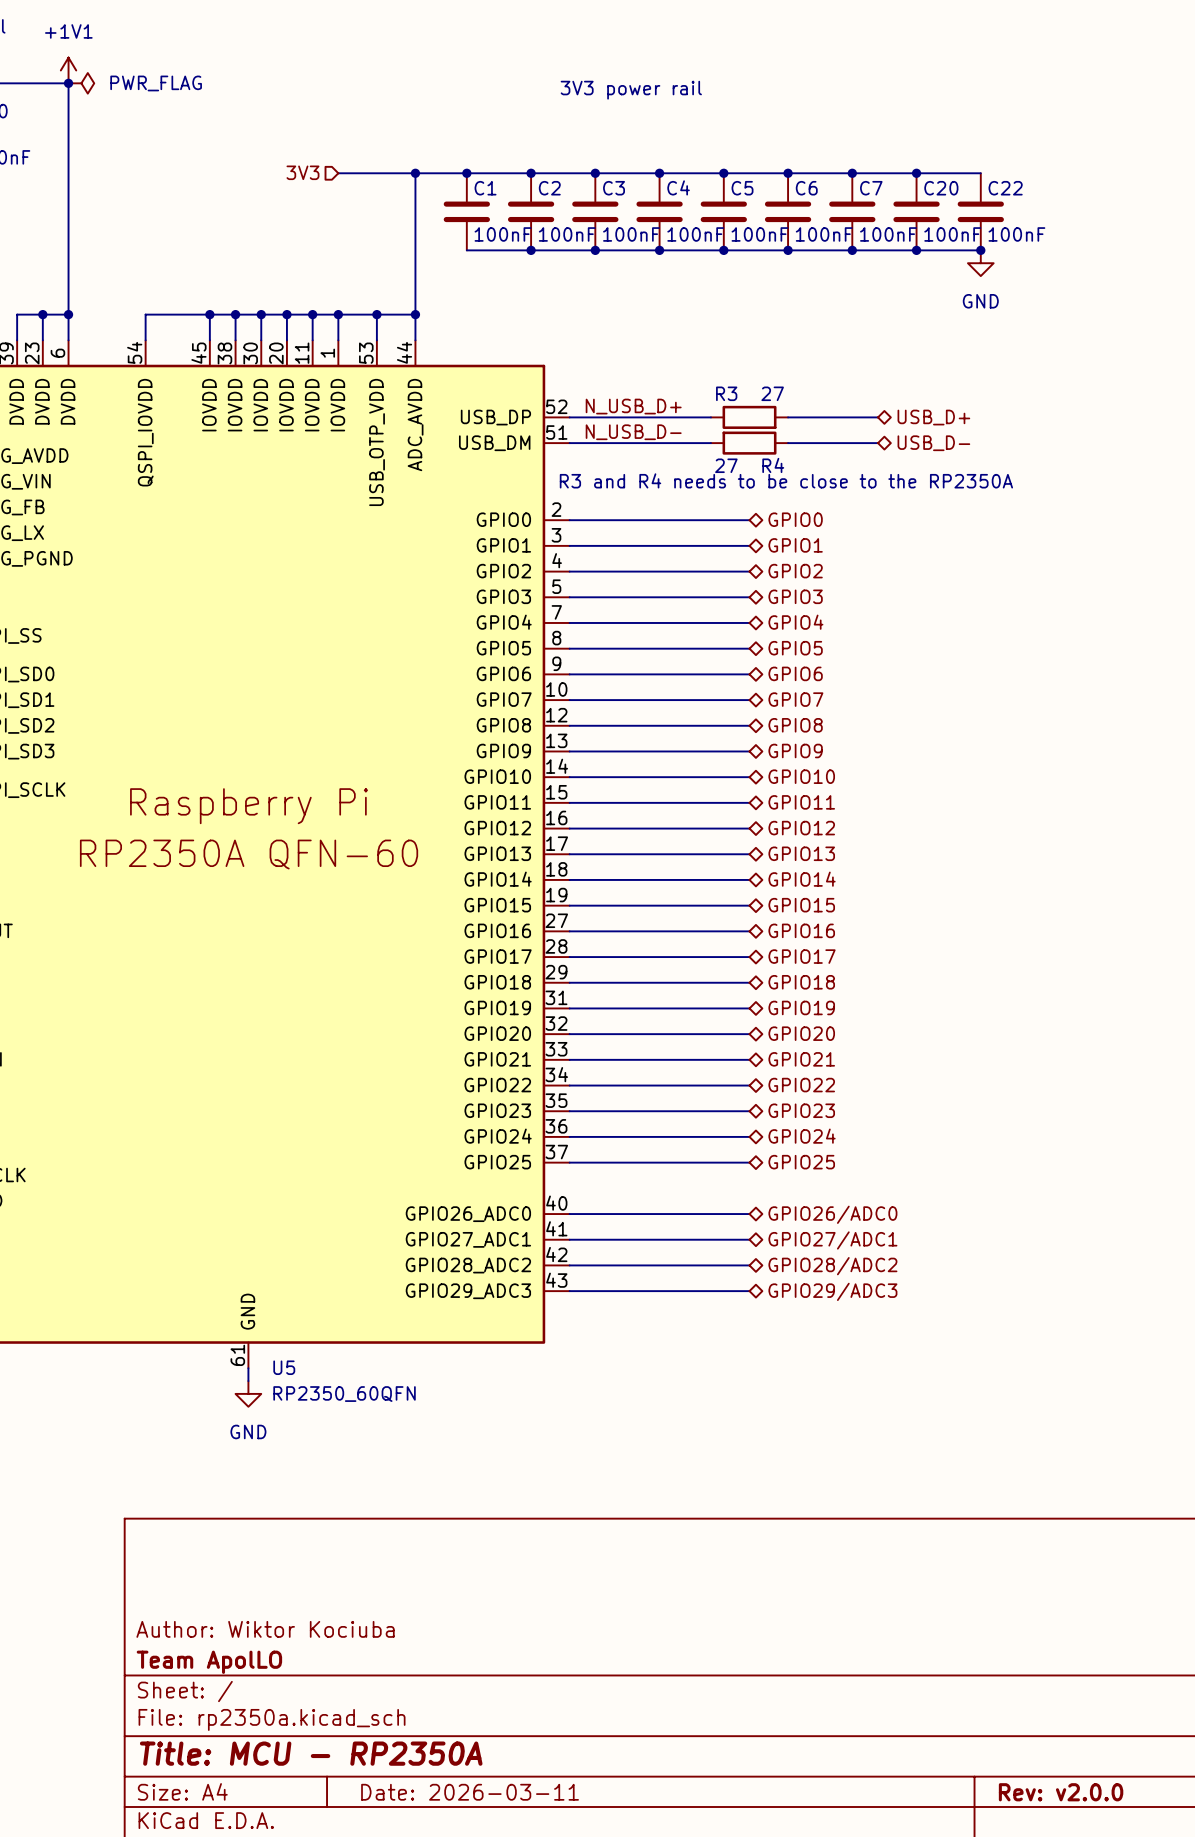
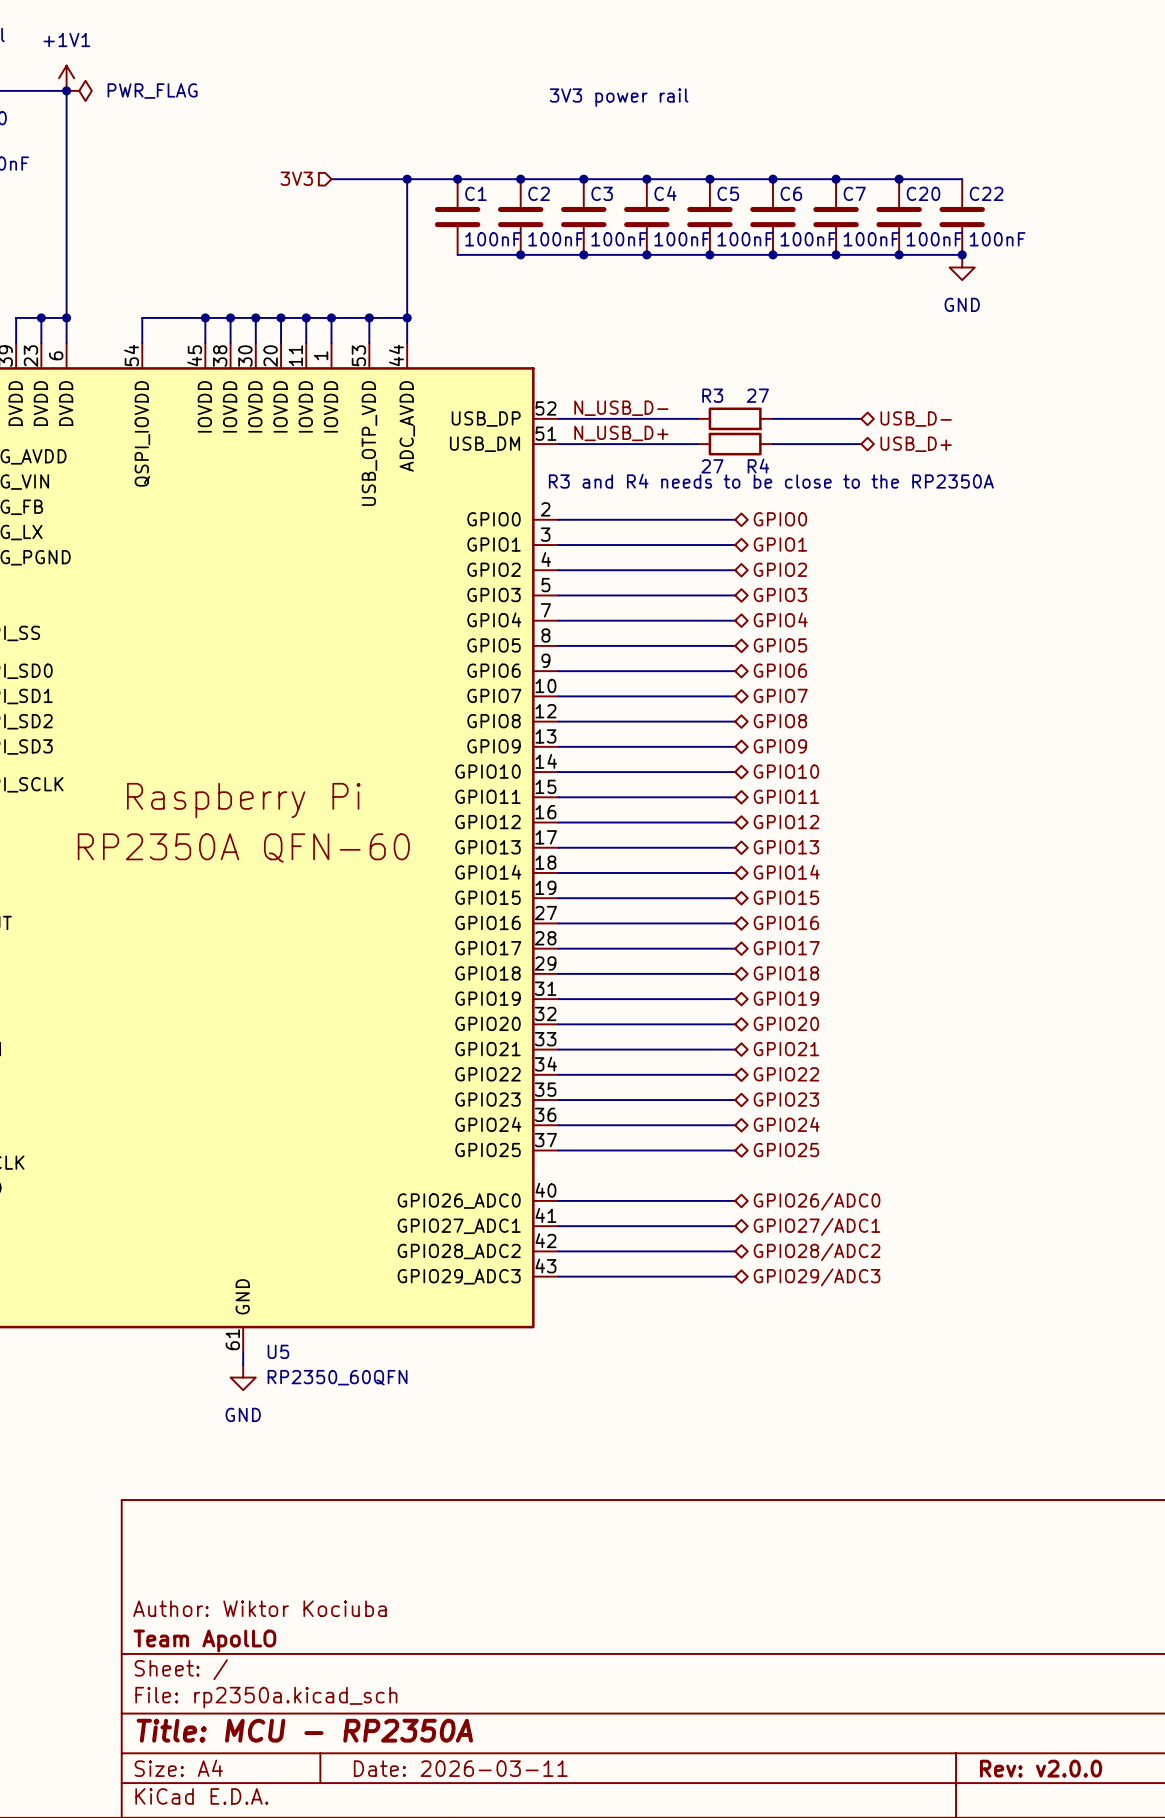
label: N_USB_D+ (633, 406) -> N_USB_D- (621, 408)
hierarchical label: USB_D+ (933, 417) -> USB_D- (916, 419)
label: N_USB_D- (633, 432) -> N_USB_D+ (621, 433)
hierarchical label: USB_D- (933, 443) -> USB_D+ (916, 444)

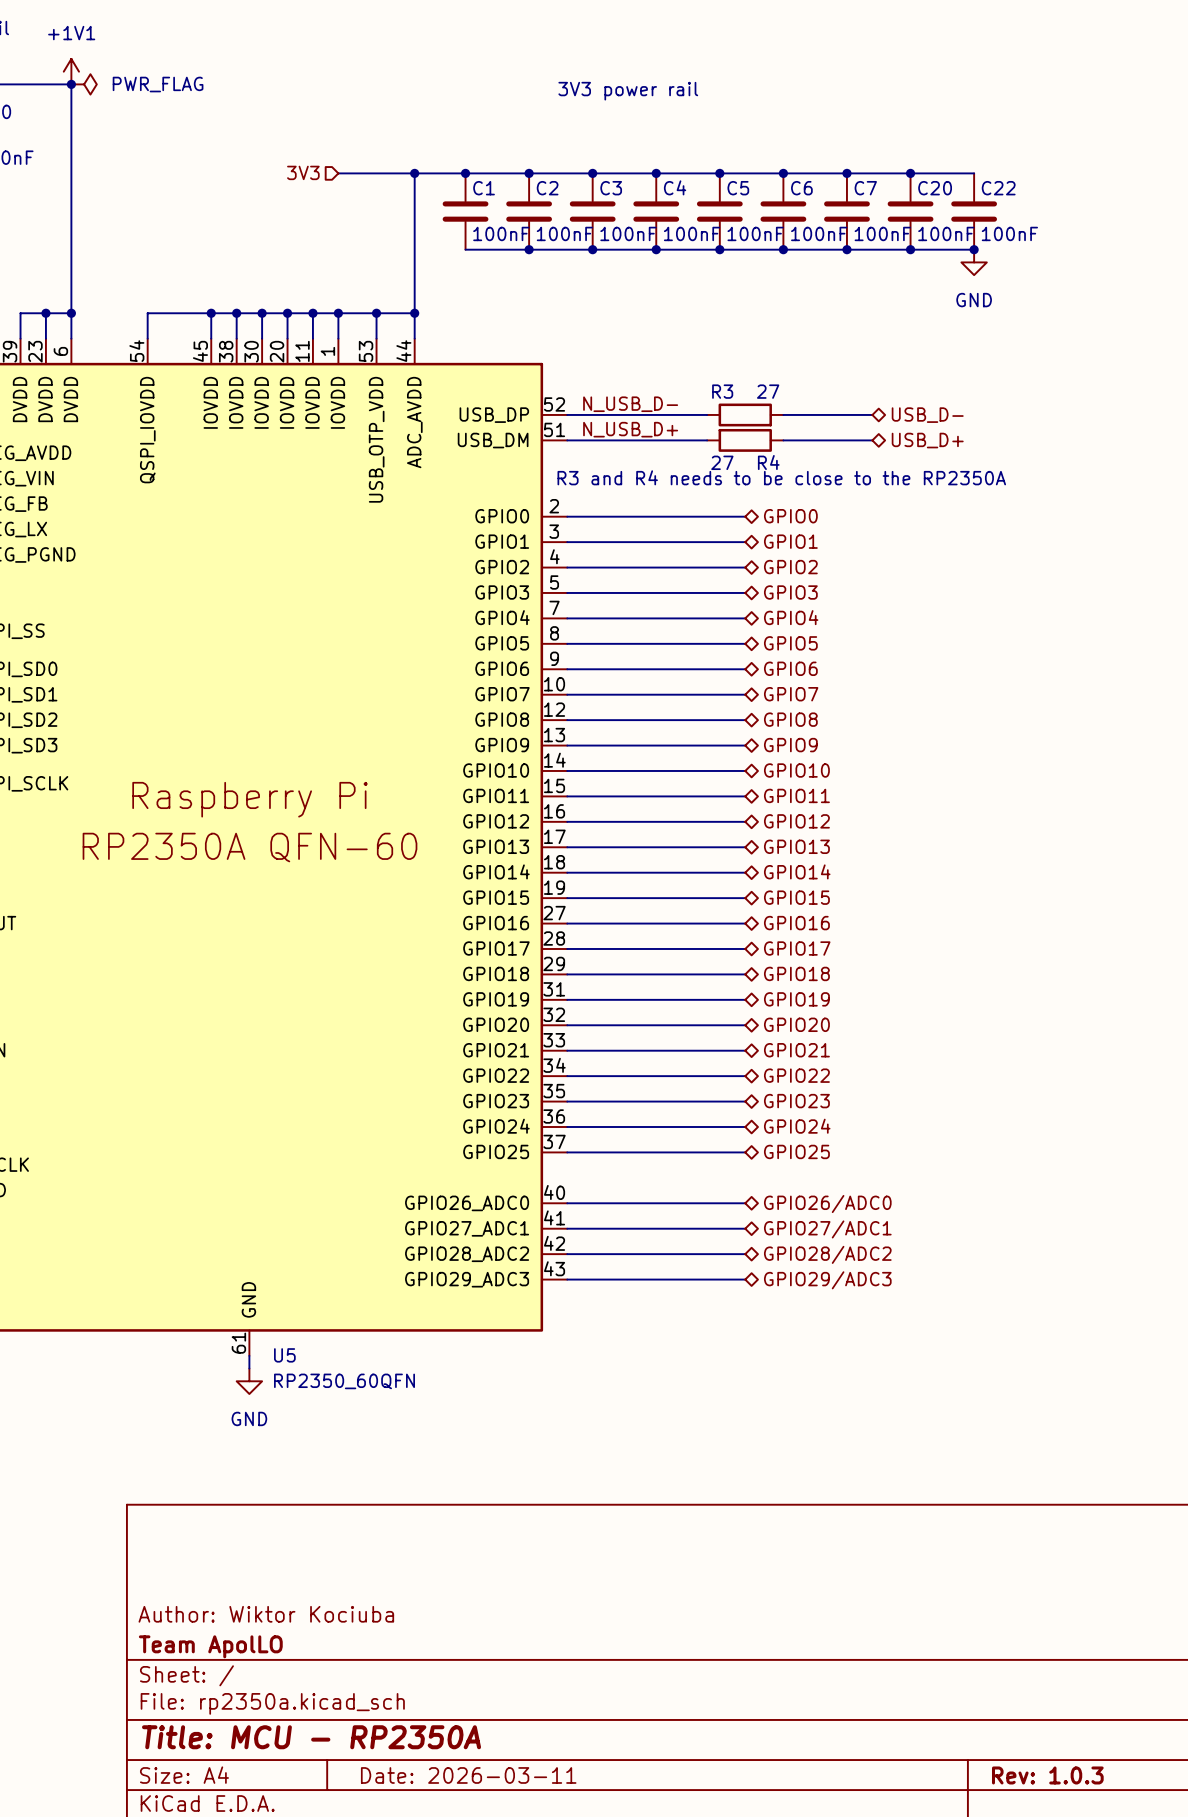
title block: Rev: v2.0.0 (1041, 1768) -> Rev: 1.0.3 (1047, 1775)

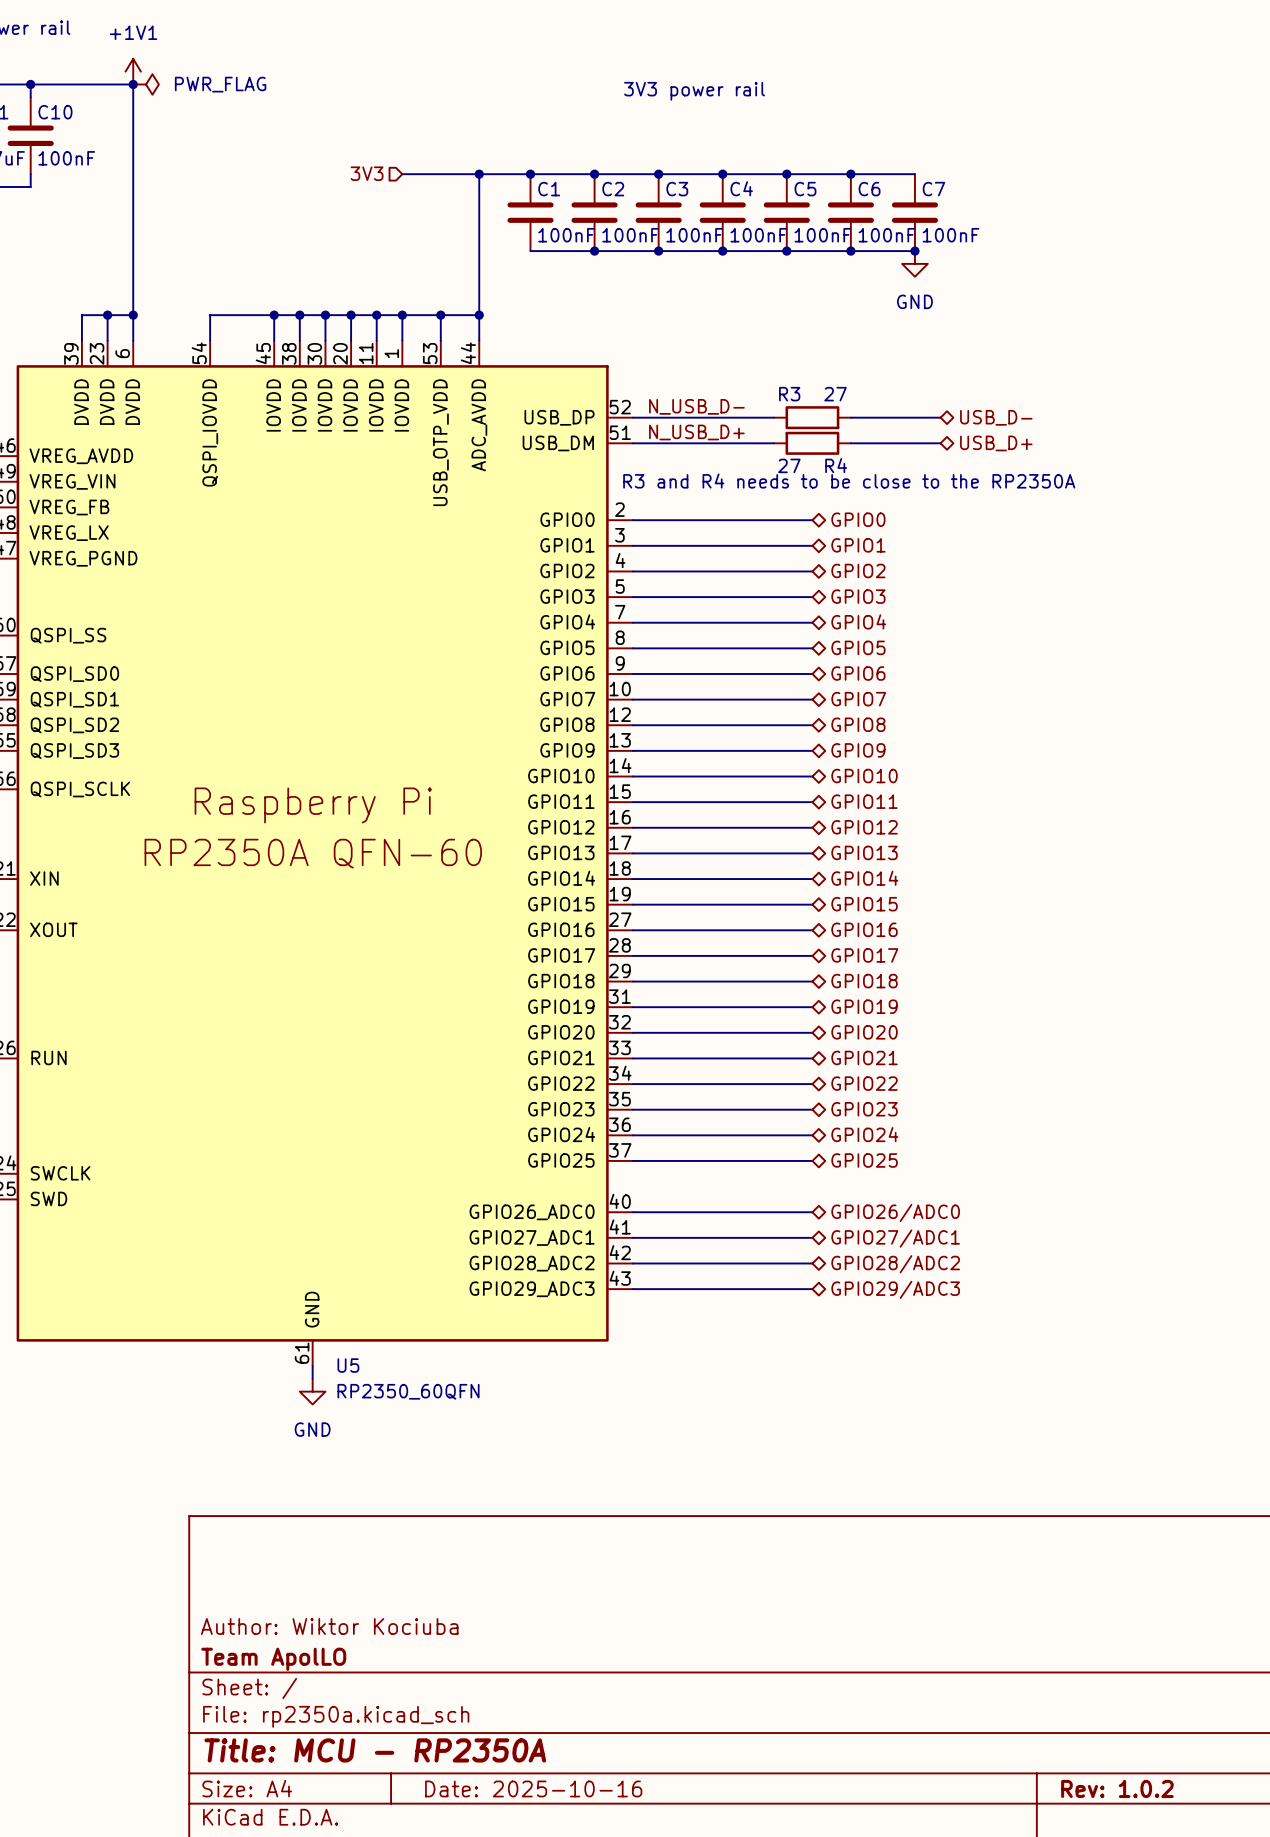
wire: (846, 173) (974, 173) -> none
junction: (846, 173) -> none
junction: (910, 173) -> none
C20: 100nF (910, 211) -> none
C22: 100nF (974, 211) -> none
wire: (846, 249) (974, 249) -> none
junction: (910, 249) -> none
junction: (974, 249) -> none
power symbol position: GND (974, 262) -> GND (914, 263)
title block: Date: 2026-03-11 (468, 1775) -> Date: 2025-10-16 (533, 1788)
title block: Rev: 1.0.3 (1047, 1775) -> Rev: 1.0.2 (1117, 1788)

